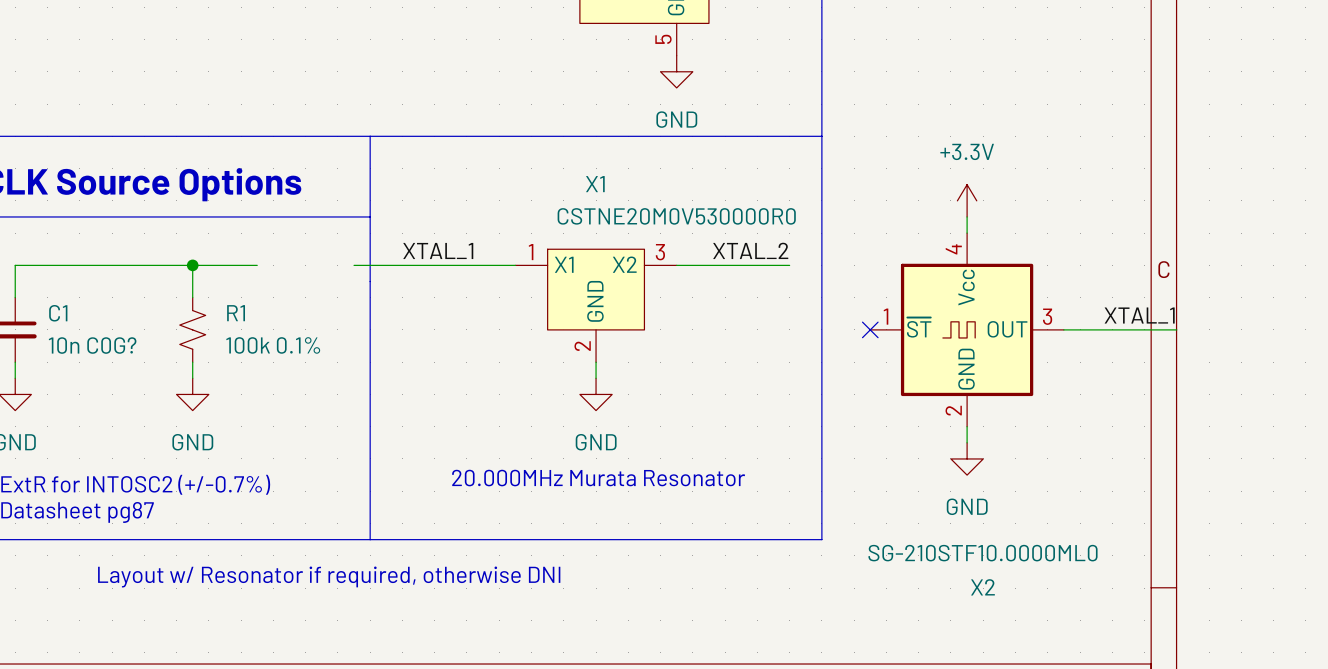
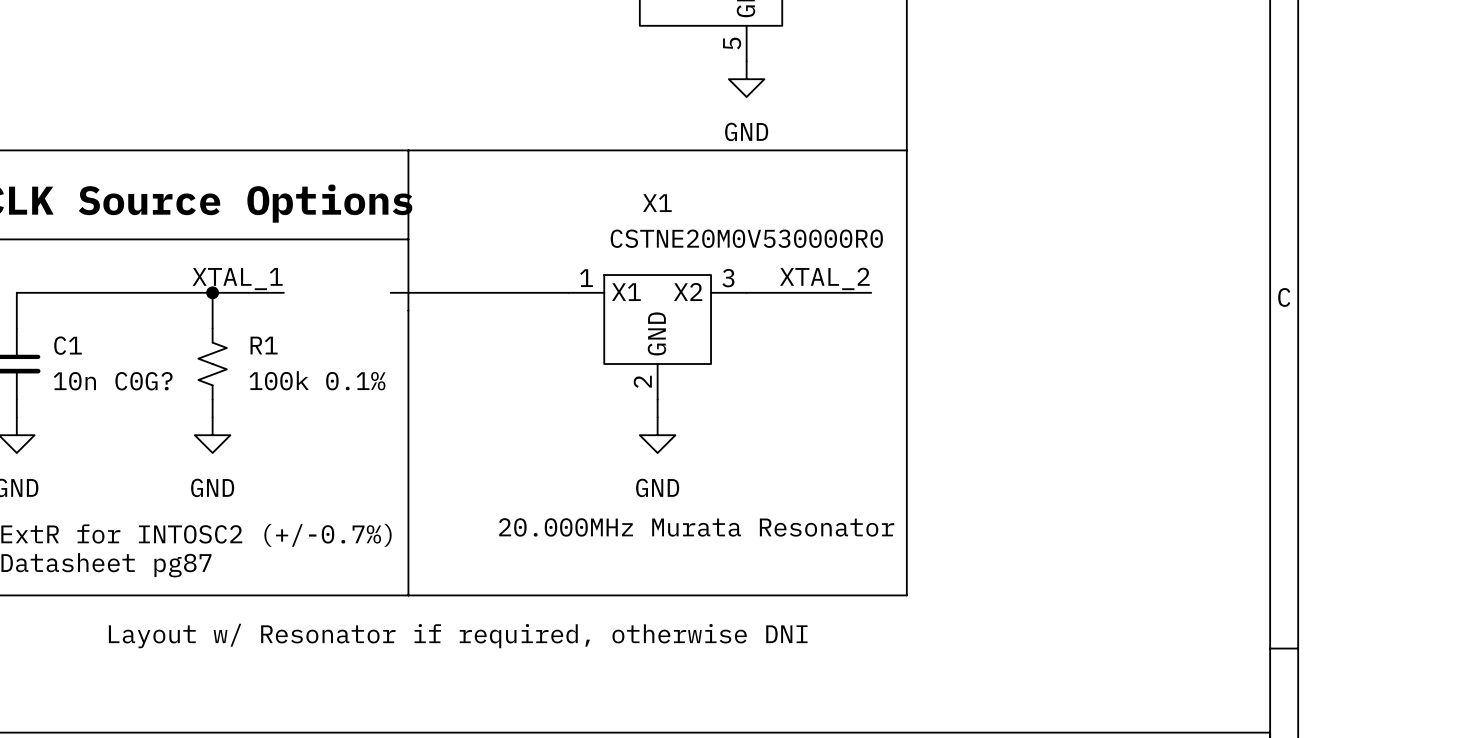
power symbol: +3.3V (967, 200) -> none
wire: (967, 216) (967, 233) -> none
label position: XTAL_1 (438, 250) -> XTAL_1 (237, 279)
label: XTAL_1 (1139, 315) -> none
no-connect mark: (870, 329) -> none
X2: SG-210STF10.0000ML0 (967, 329) -> none
wire: (1063, 329) (1176, 329) -> none
wire: (967, 426) (967, 442) -> none
power symbol: GND (967, 458) -> none

